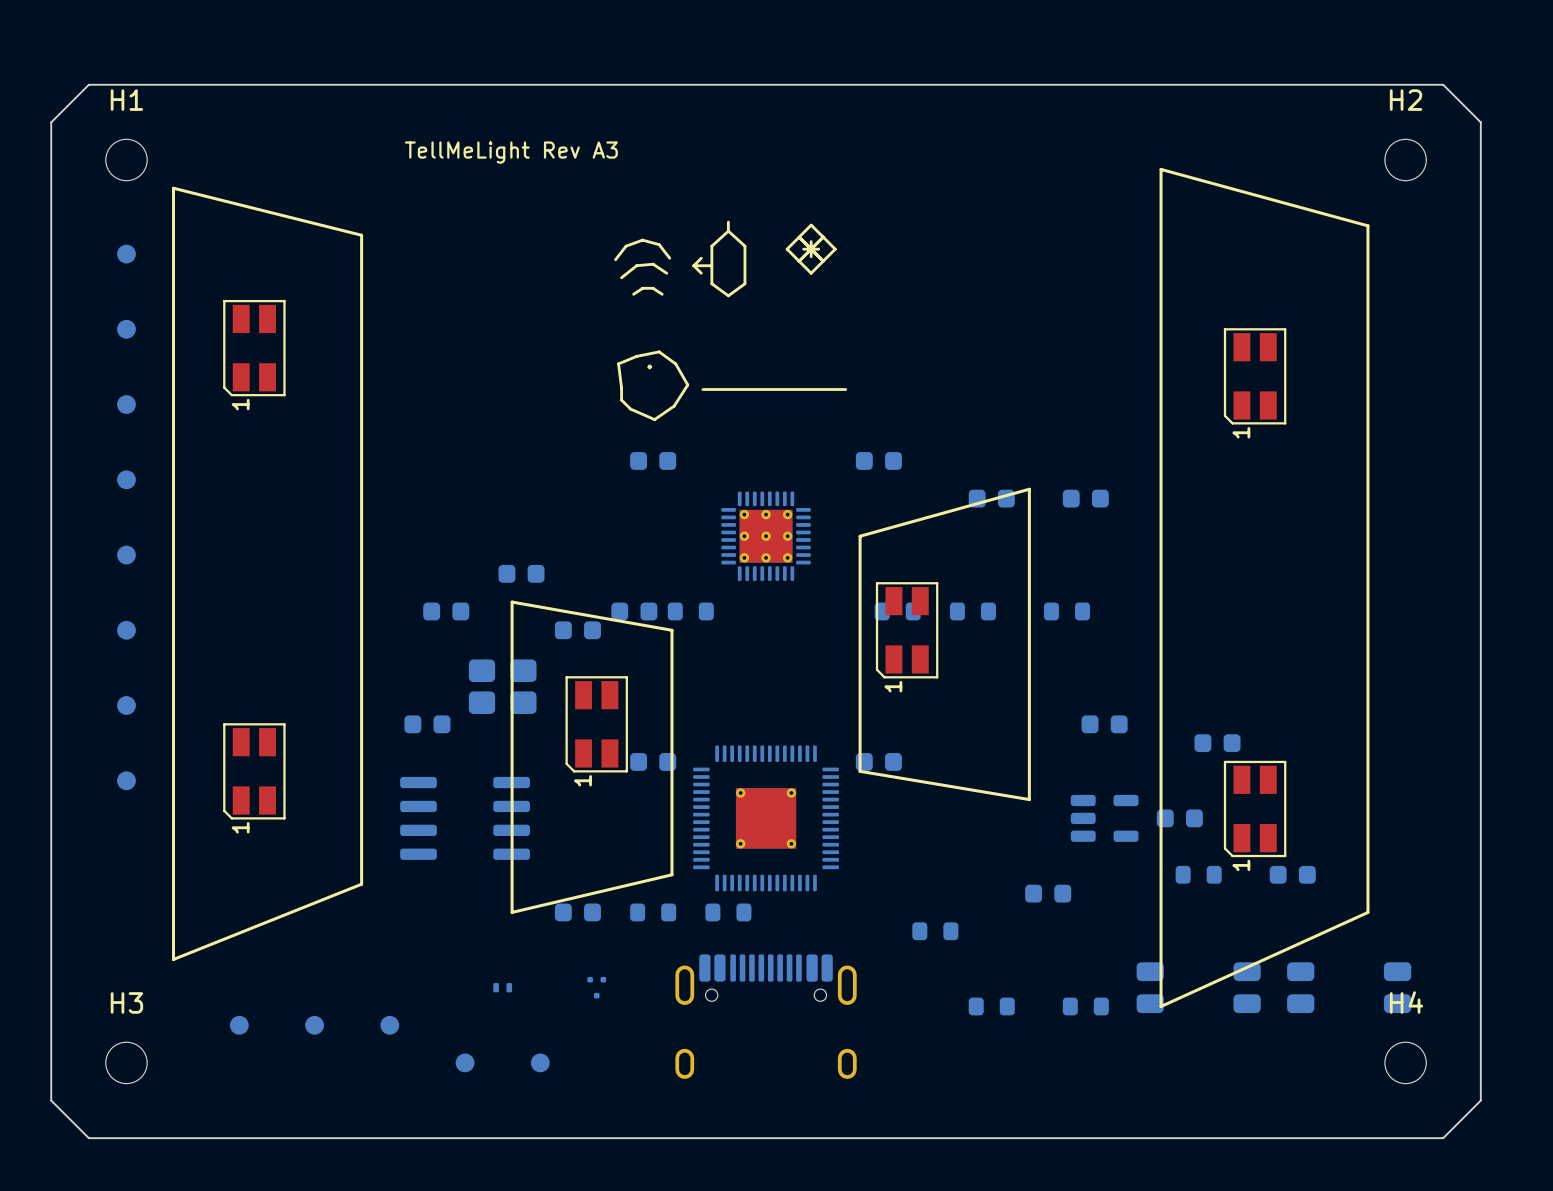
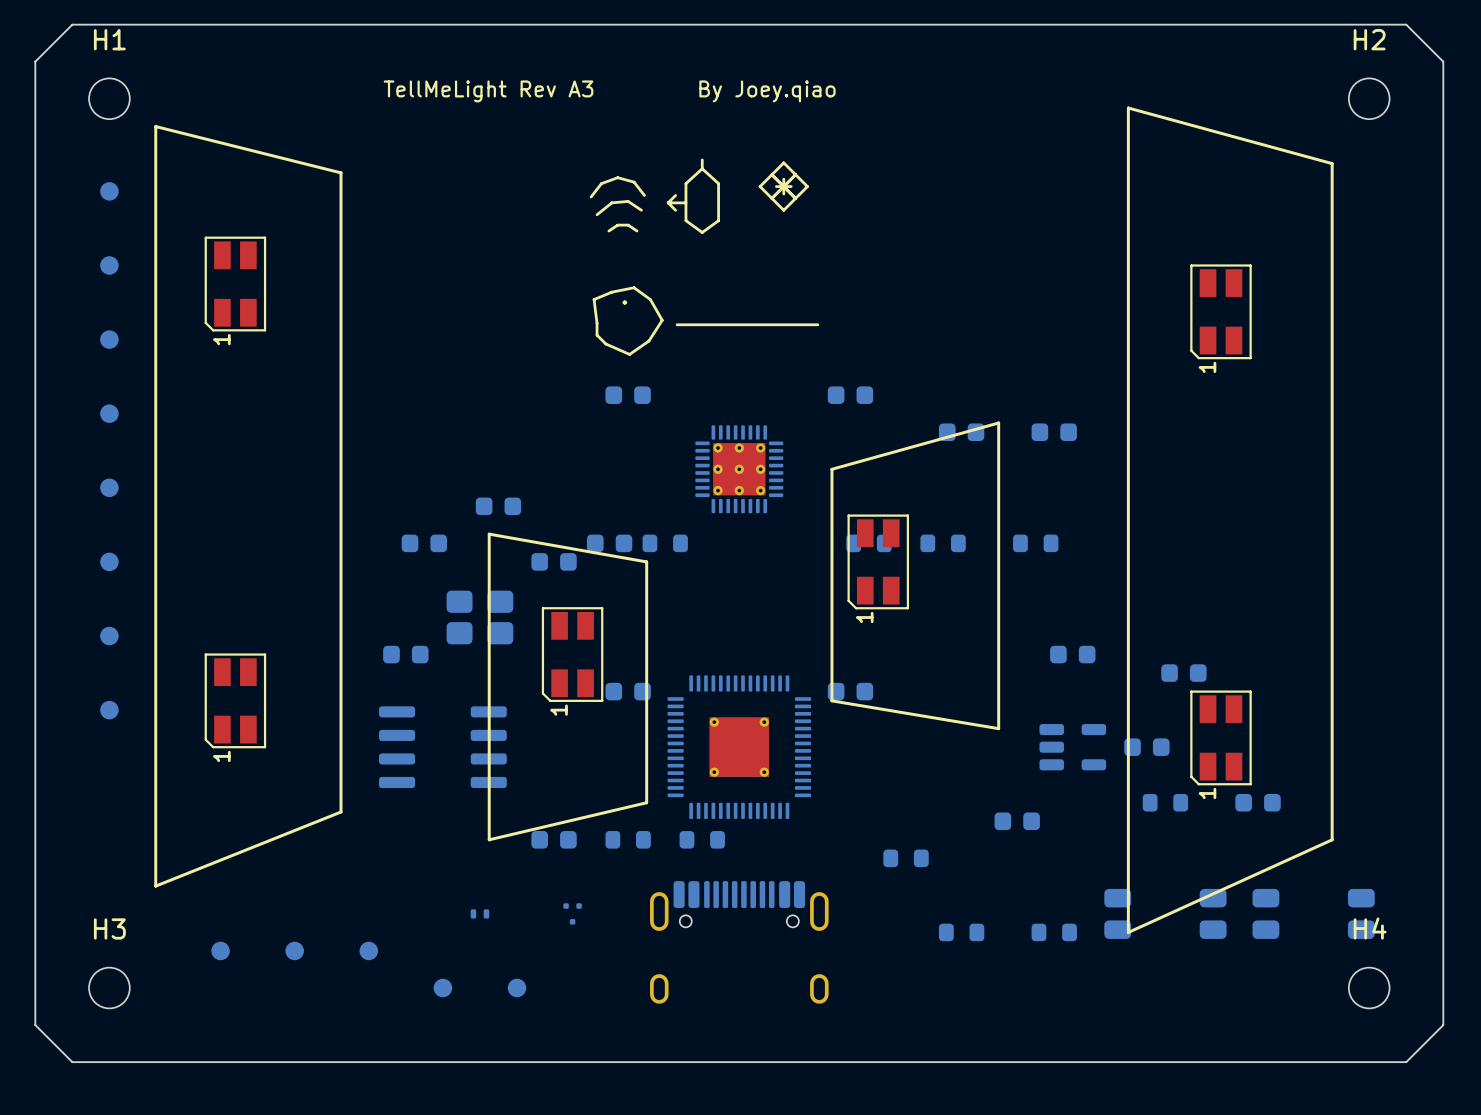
text: none -> By Joey.qiao (767, 91)

